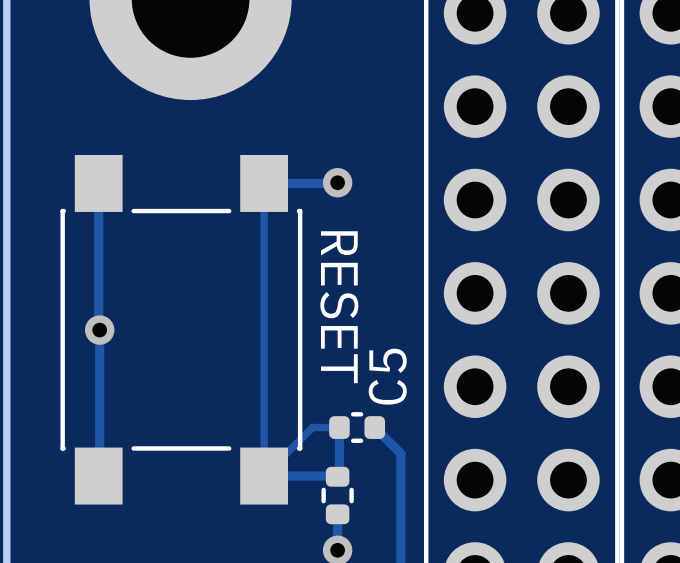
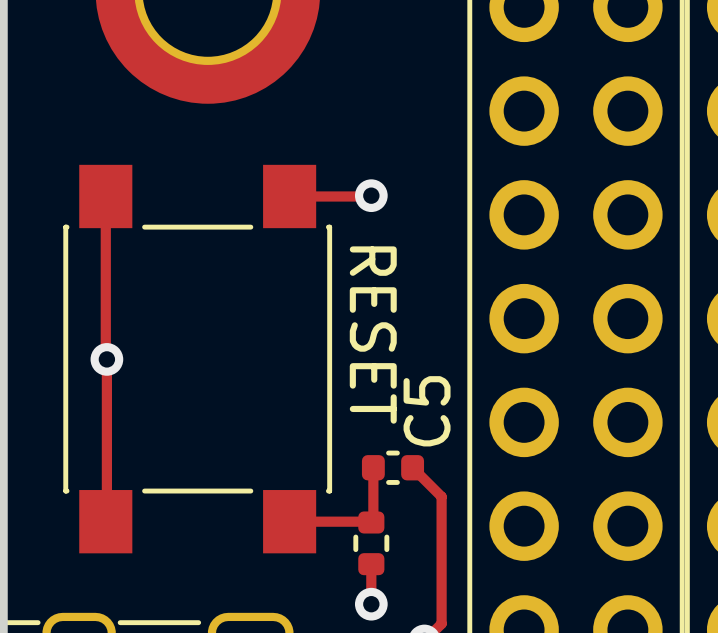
track: (264, 183) (264, 476) (312, 427) (339, 427) -> none

